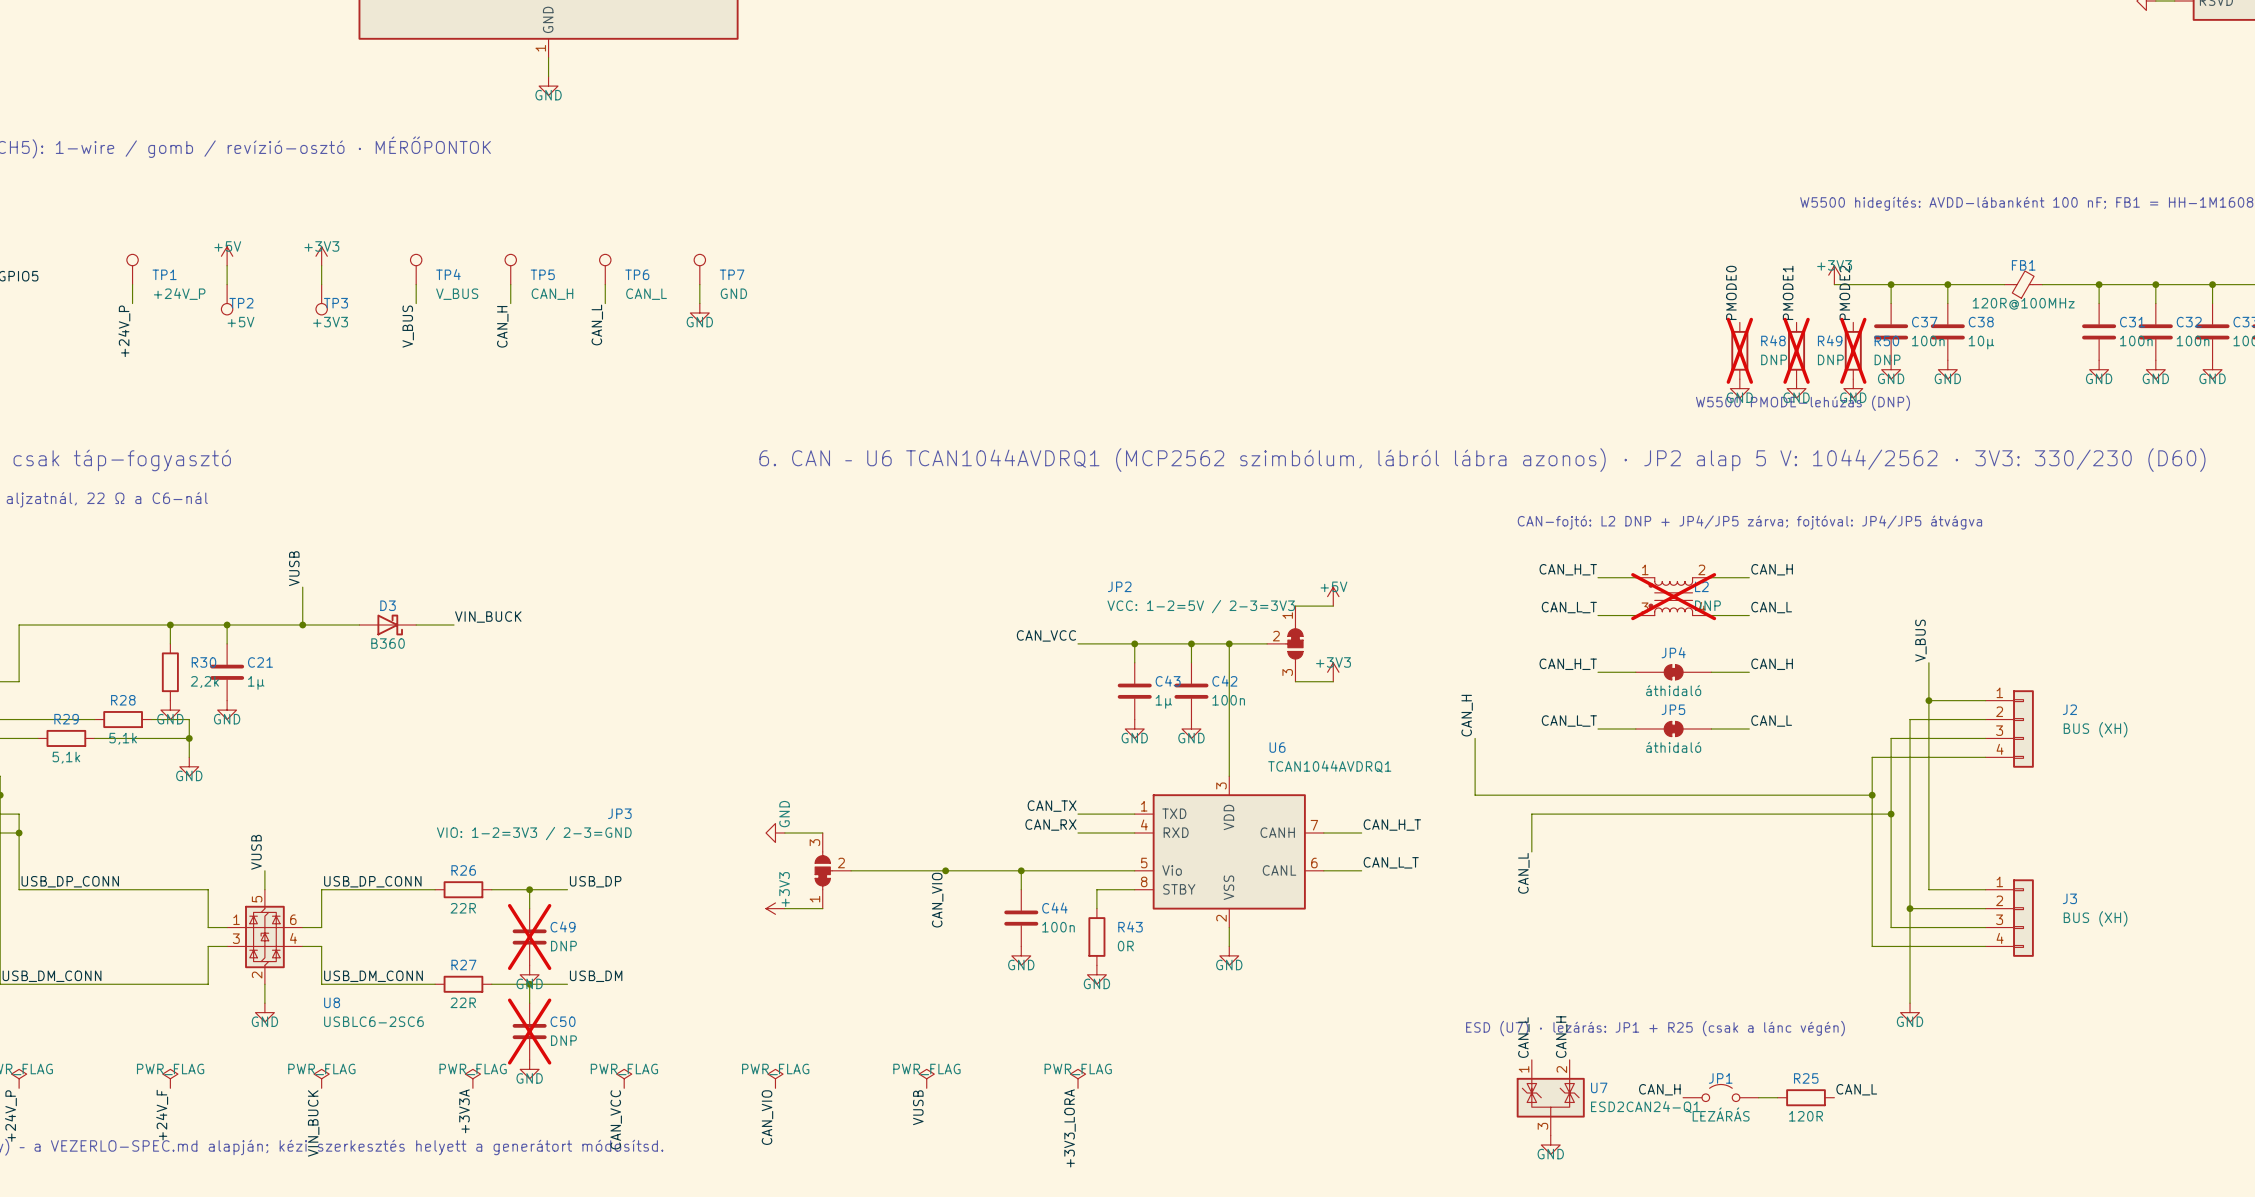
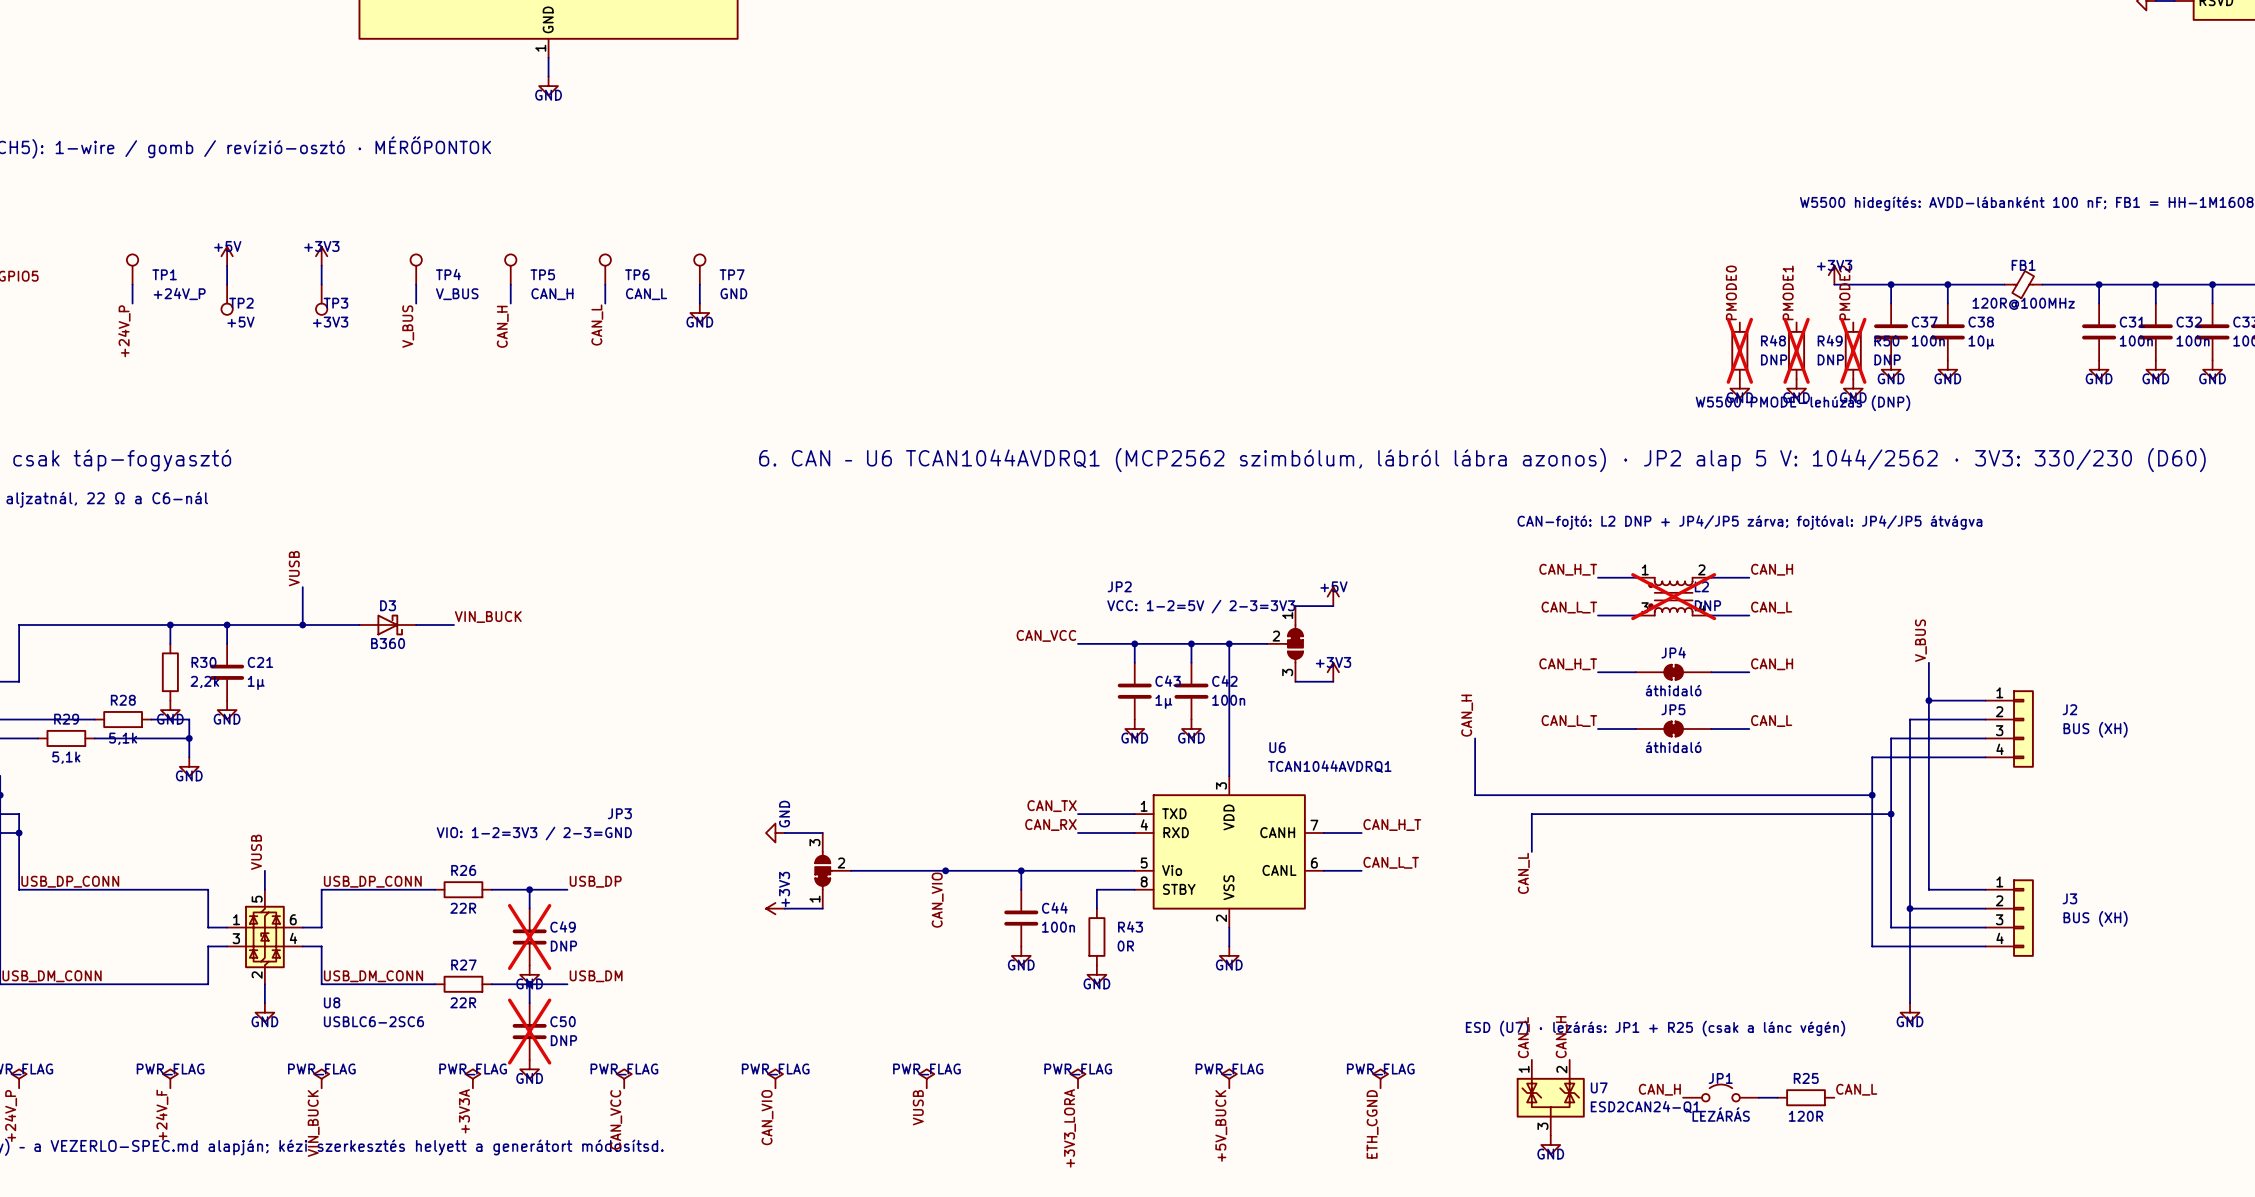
power symbol: none -> PWR_FLAG (1229, 1078)
power symbol: none -> PWR_FLAG (1380, 1078)
label: none -> ETH_CGND (1372, 1124)
label: none -> +5V_BUCK (1221, 1125)

